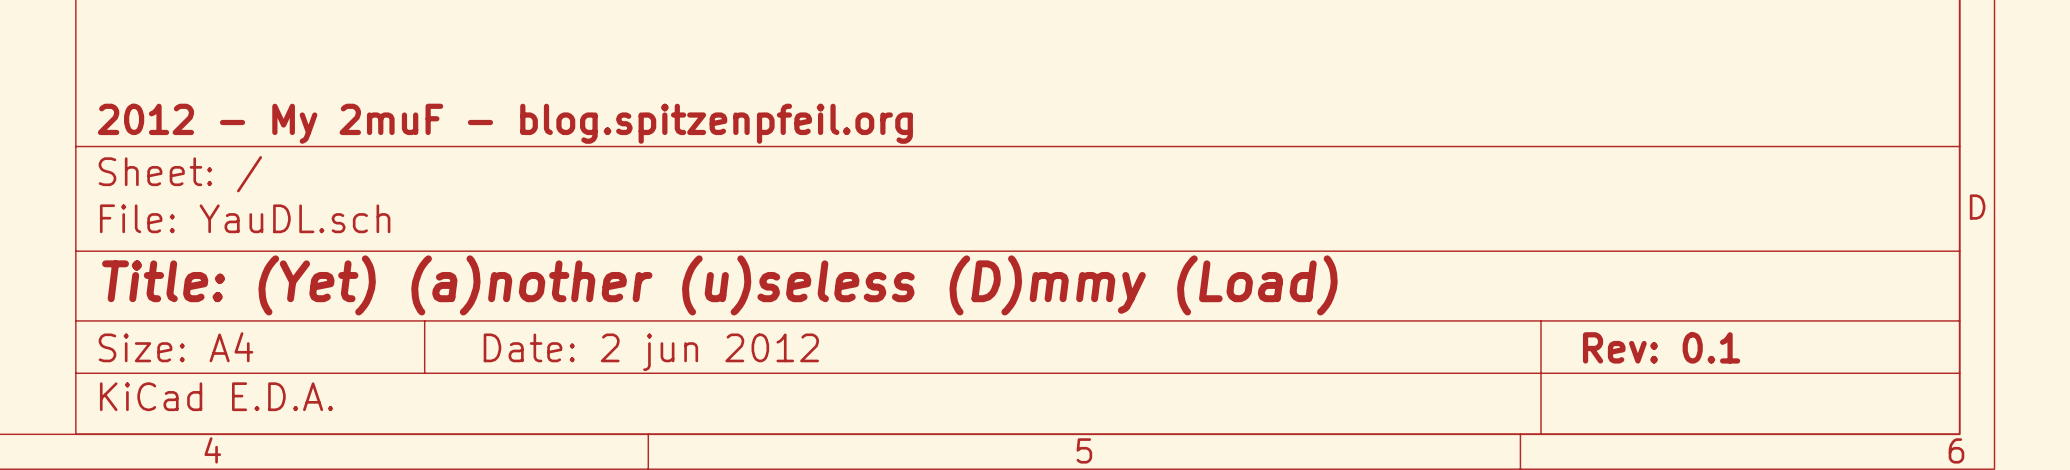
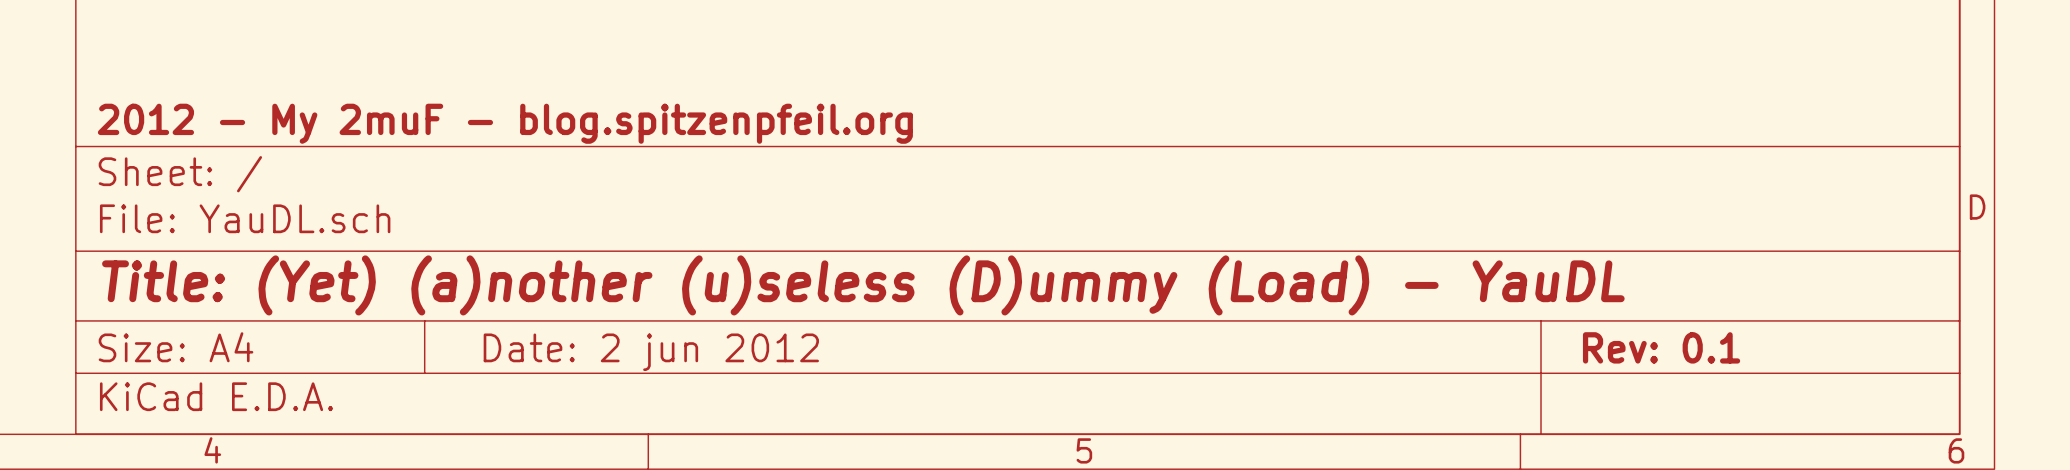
title block: Title: (Yet) (a)nother (u)seless (D)mmy (Load) (719, 285) -> Title: (Yet) (a)nother (u)seless (D)ummy (Load) - YauDL (863, 285)

